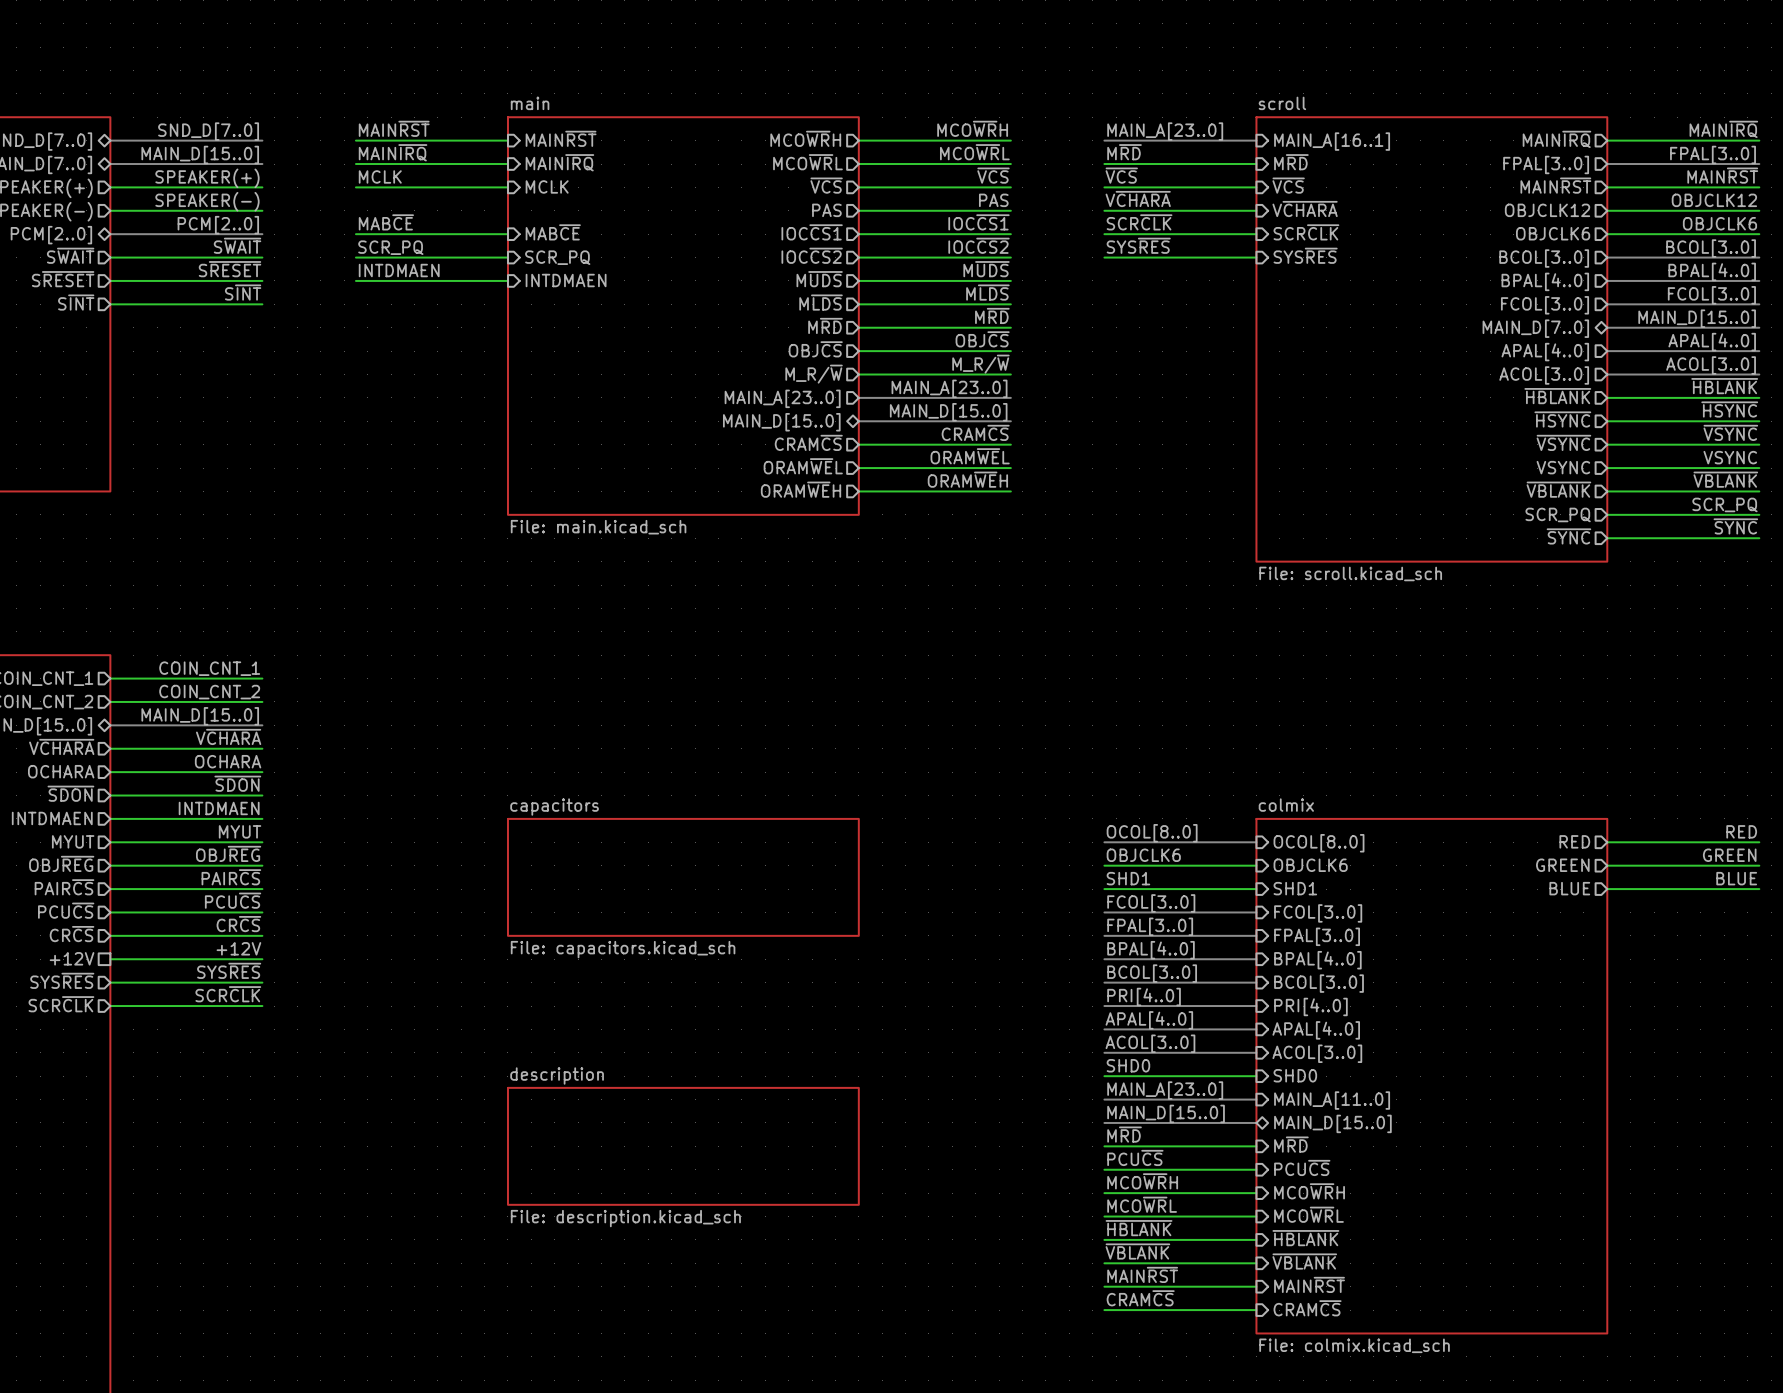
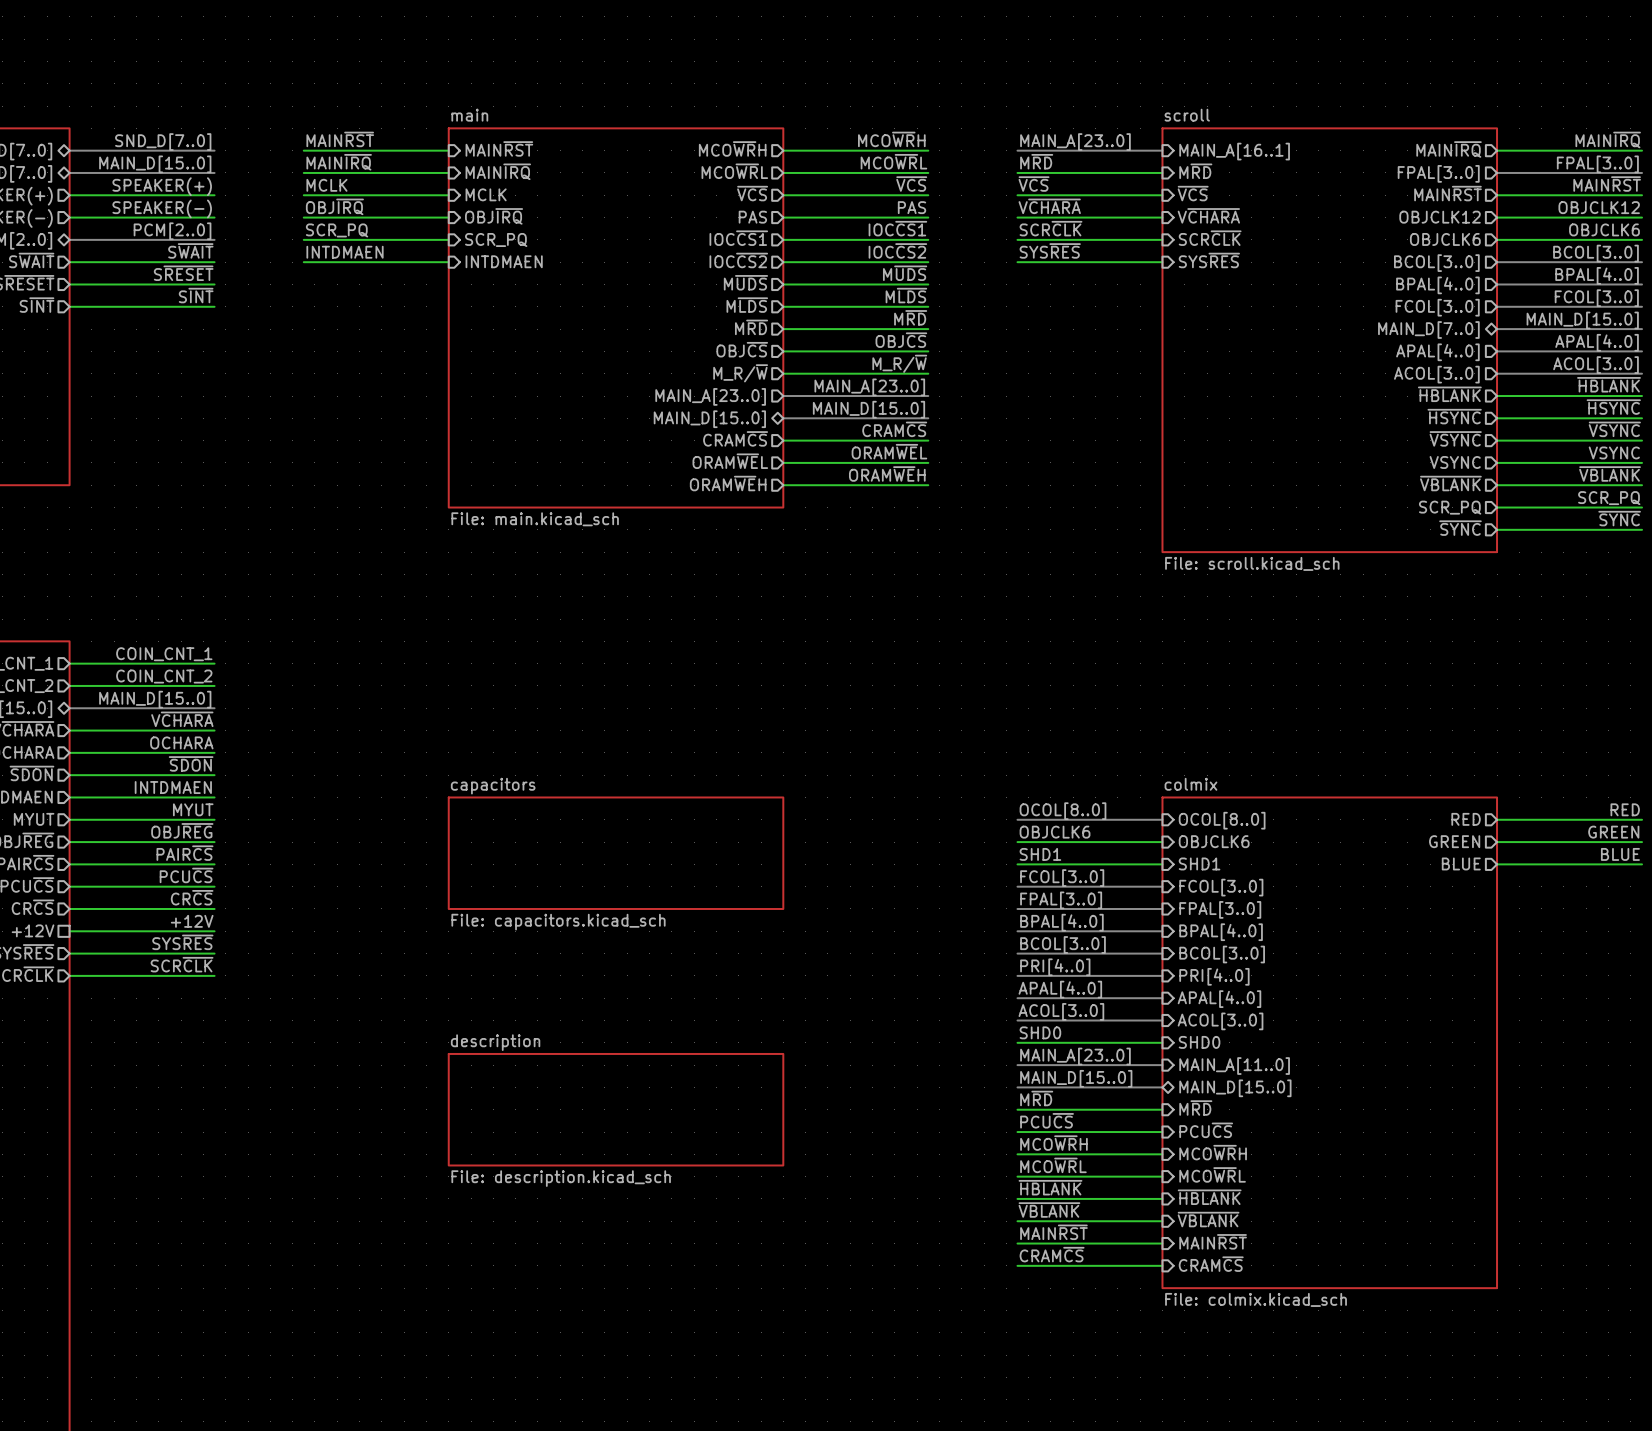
label: none -> OBJ~{IRQ} (334, 206)
sheet pin: none -> OBJ~{IRQ} (494, 216)
label: MAB~{CE} (386, 222) -> SCR_PQ (337, 230)
sheet pin: MAB~{CE} (553, 232) -> SCR_PQ (496, 239)
label: SCR_PQ (390, 247) -> INTDMAEN (345, 252)
sheet pin: SCR_PQ (557, 257) -> INTDMAEN (504, 261)
label: INTDMAEN (399, 270) -> none
wire: (355, 280) (507, 280) -> (303, 217) (448, 217)
sheet pin: INTDMAEN (566, 280) -> none

